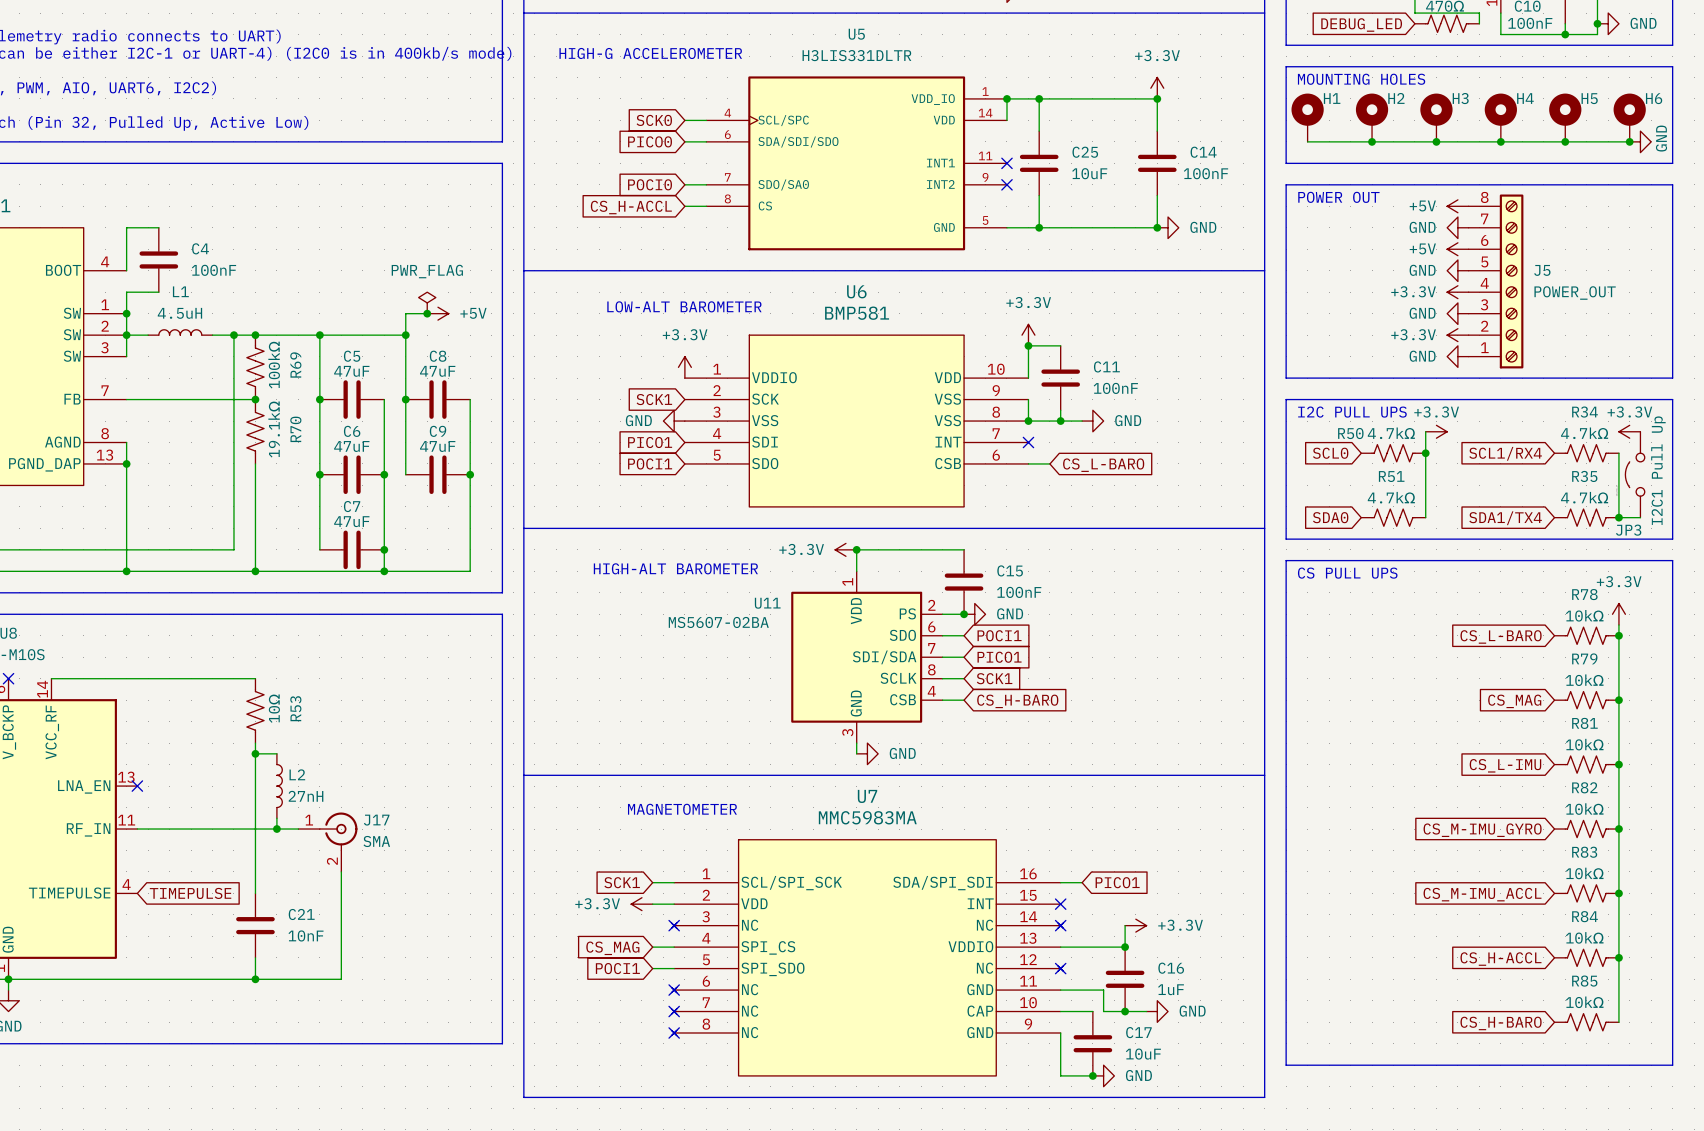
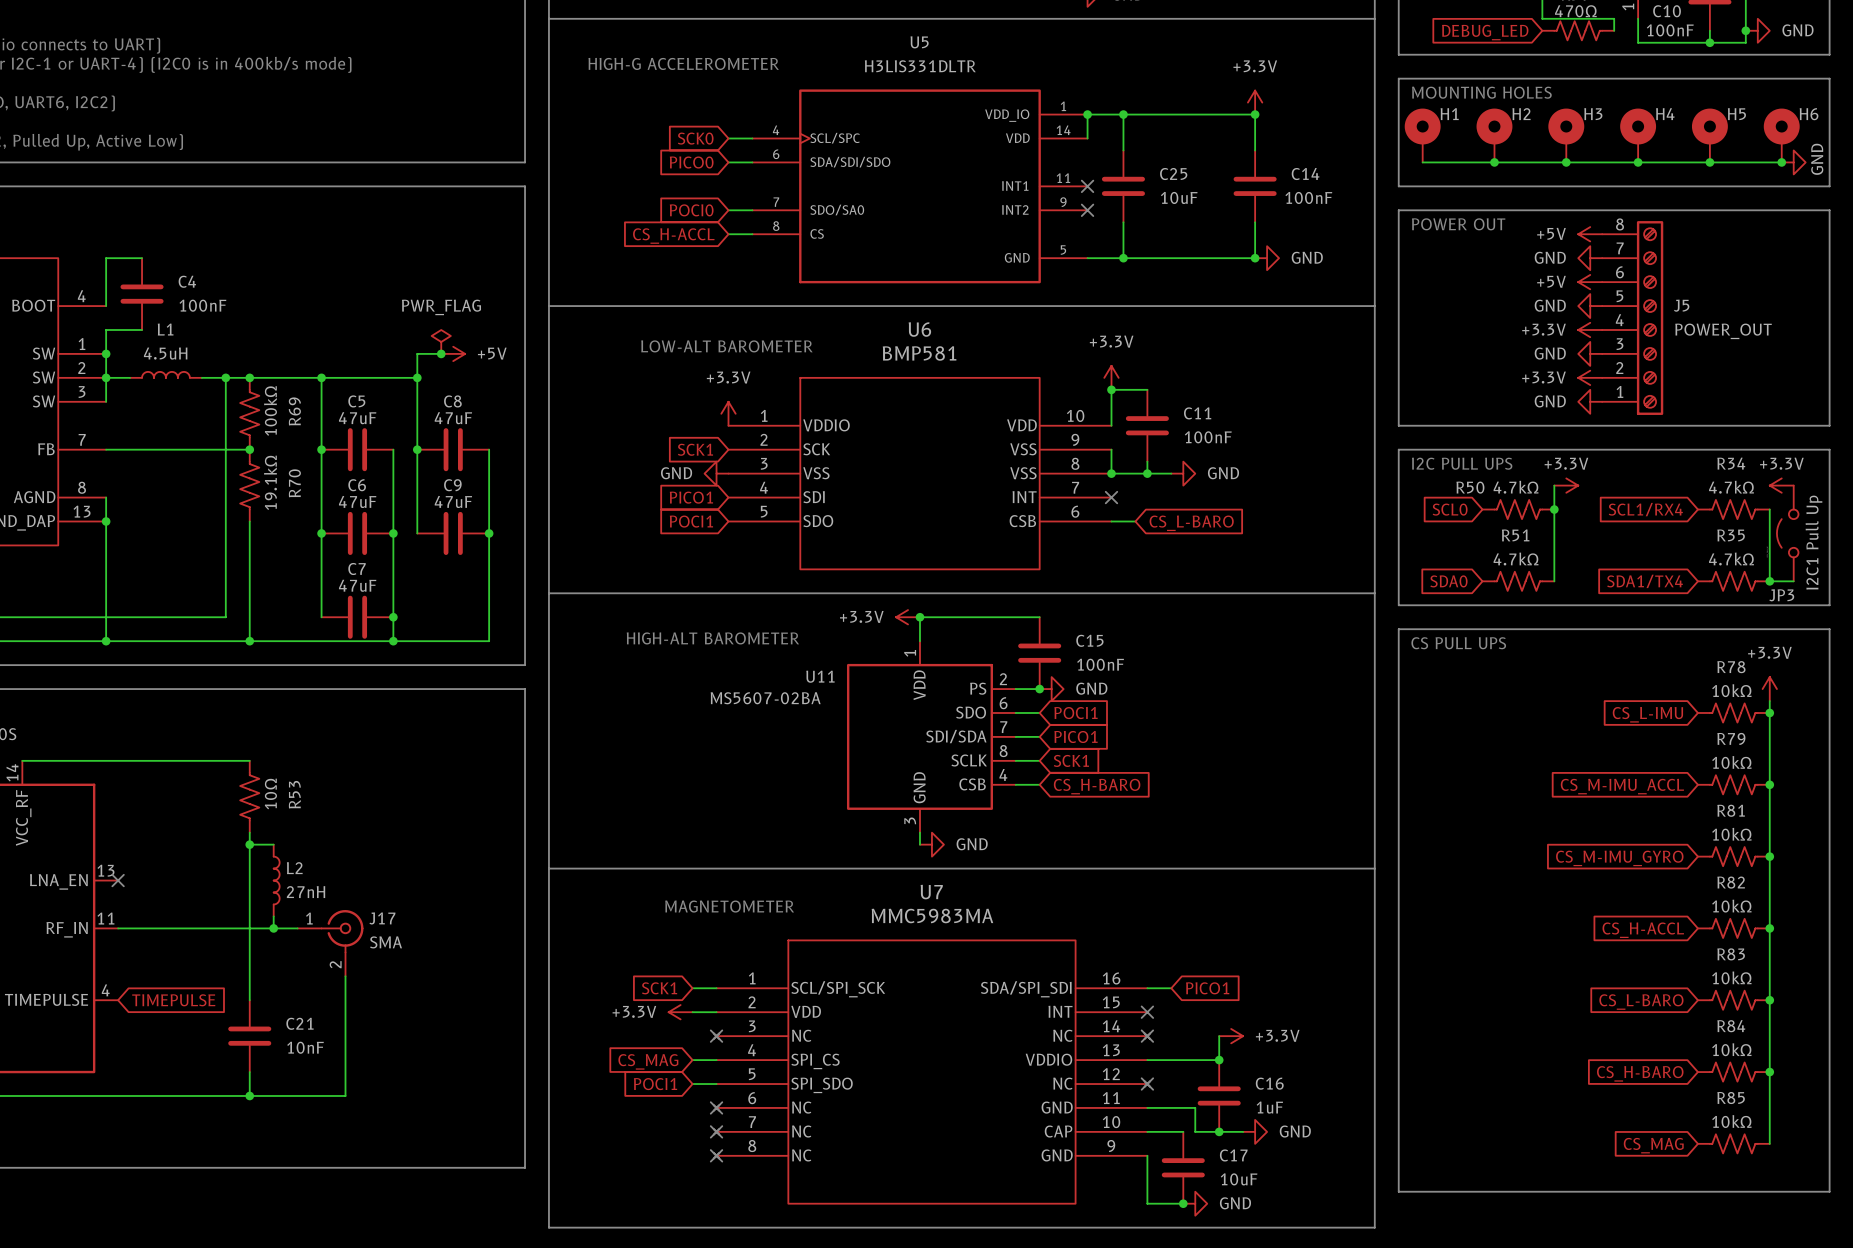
global label: CS_L-BARO (1501, 636) -> CS_L-IMU (1647, 714)
global label: CS_MAG (1514, 701) -> CS_M-IMU_ACCL (1622, 786)
global label: CS_L-IMU (1505, 765) -> CS_M-IMU_GYRO (1619, 858)
global label: CS_M-IMU_GYRO (1482, 830) -> CS_H-ACCL (1643, 930)
global label: CS_M-IMU_ACCL (1482, 894) -> CS_L-BARO (1641, 1002)
global label: CS_H-ACCL (1500, 959) -> CS_H-BARO (1640, 1073)
global label: CS_H-BARO (1501, 1023) -> CS_MAG (1653, 1145)

